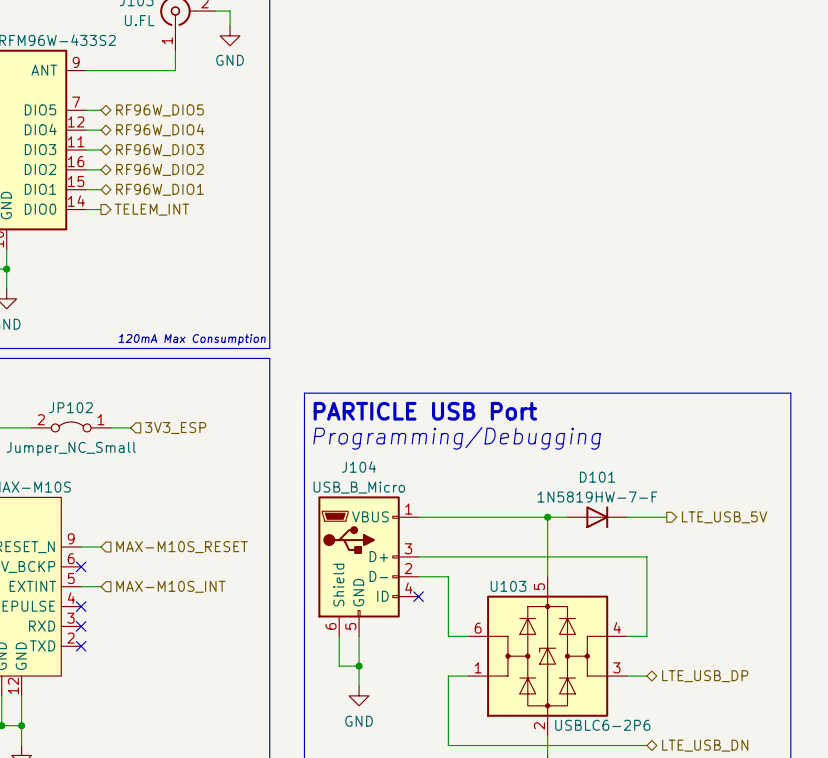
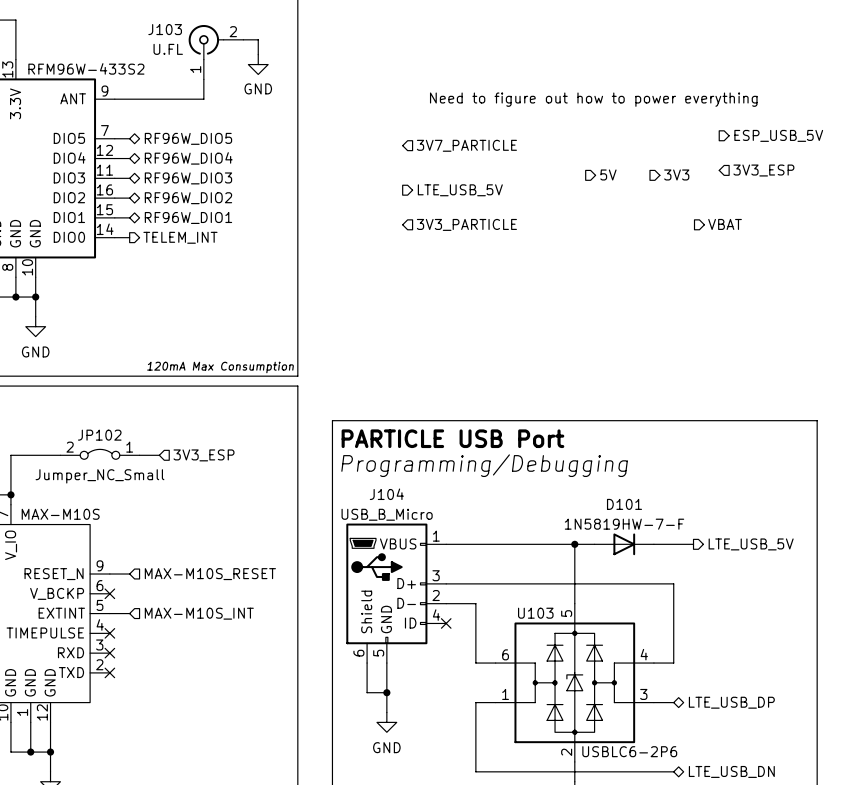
text: none -> Need to figure out how to power everything (593, 99)
hierarchical label: none -> ESP_USB_5V (778, 135)
hierarchical label: none -> 3V7_PARTICLE (466, 145)
hierarchical label: none -> 3V3_ESP (763, 170)
hierarchical label: none -> 5V (608, 174)
hierarchical label: none -> 3V3 (676, 174)
hierarchical label: none -> LTE_USB_5V (460, 190)
hierarchical label: none -> 3V3_PARTICLE (466, 224)
hierarchical label: none -> VBAT (725, 224)

